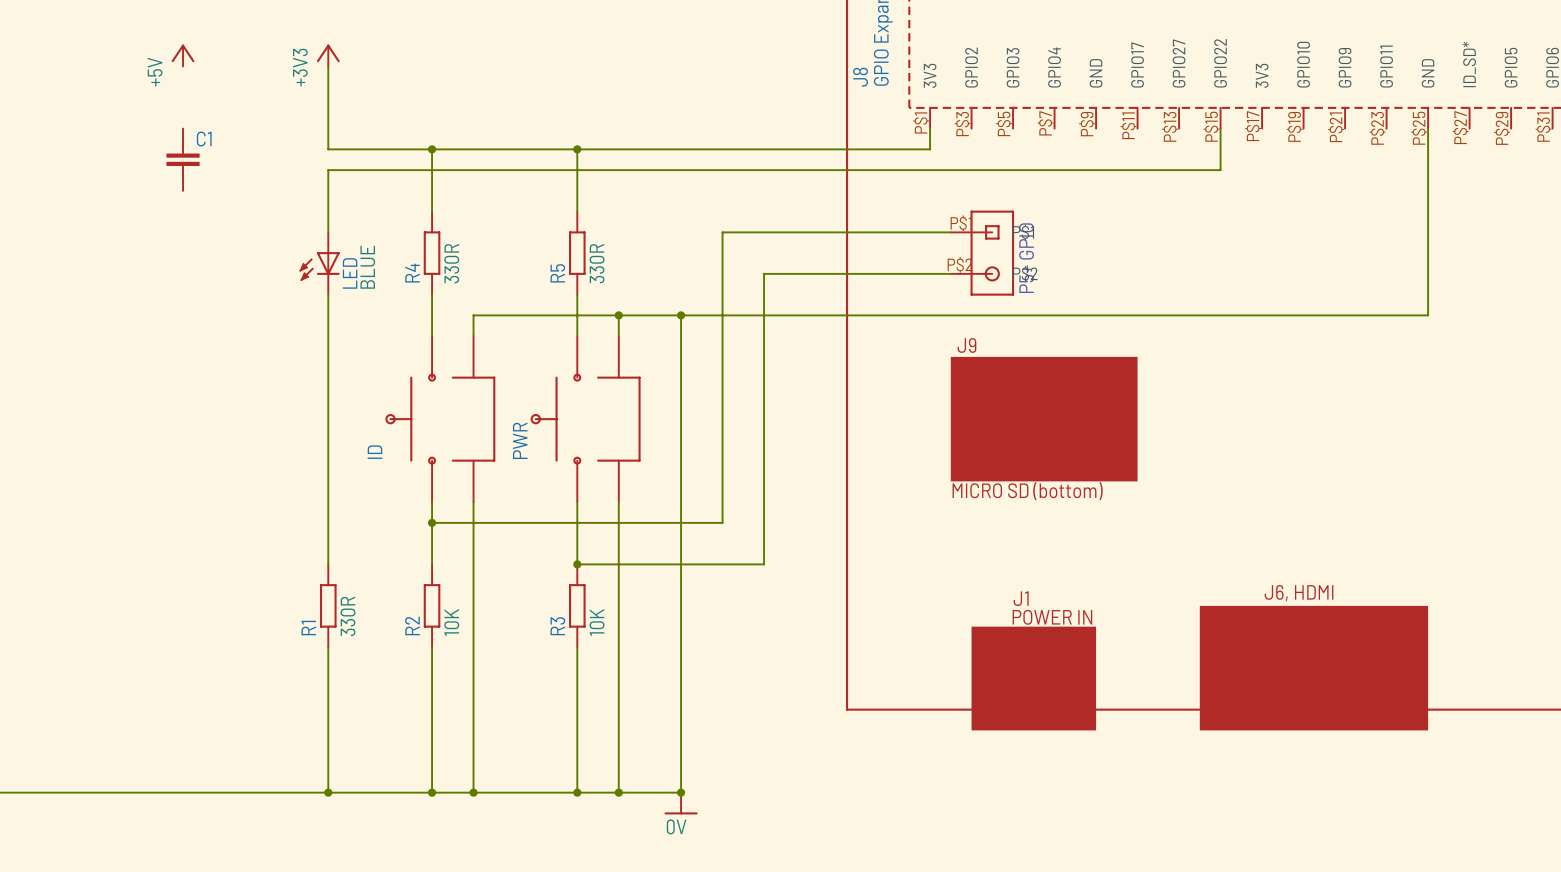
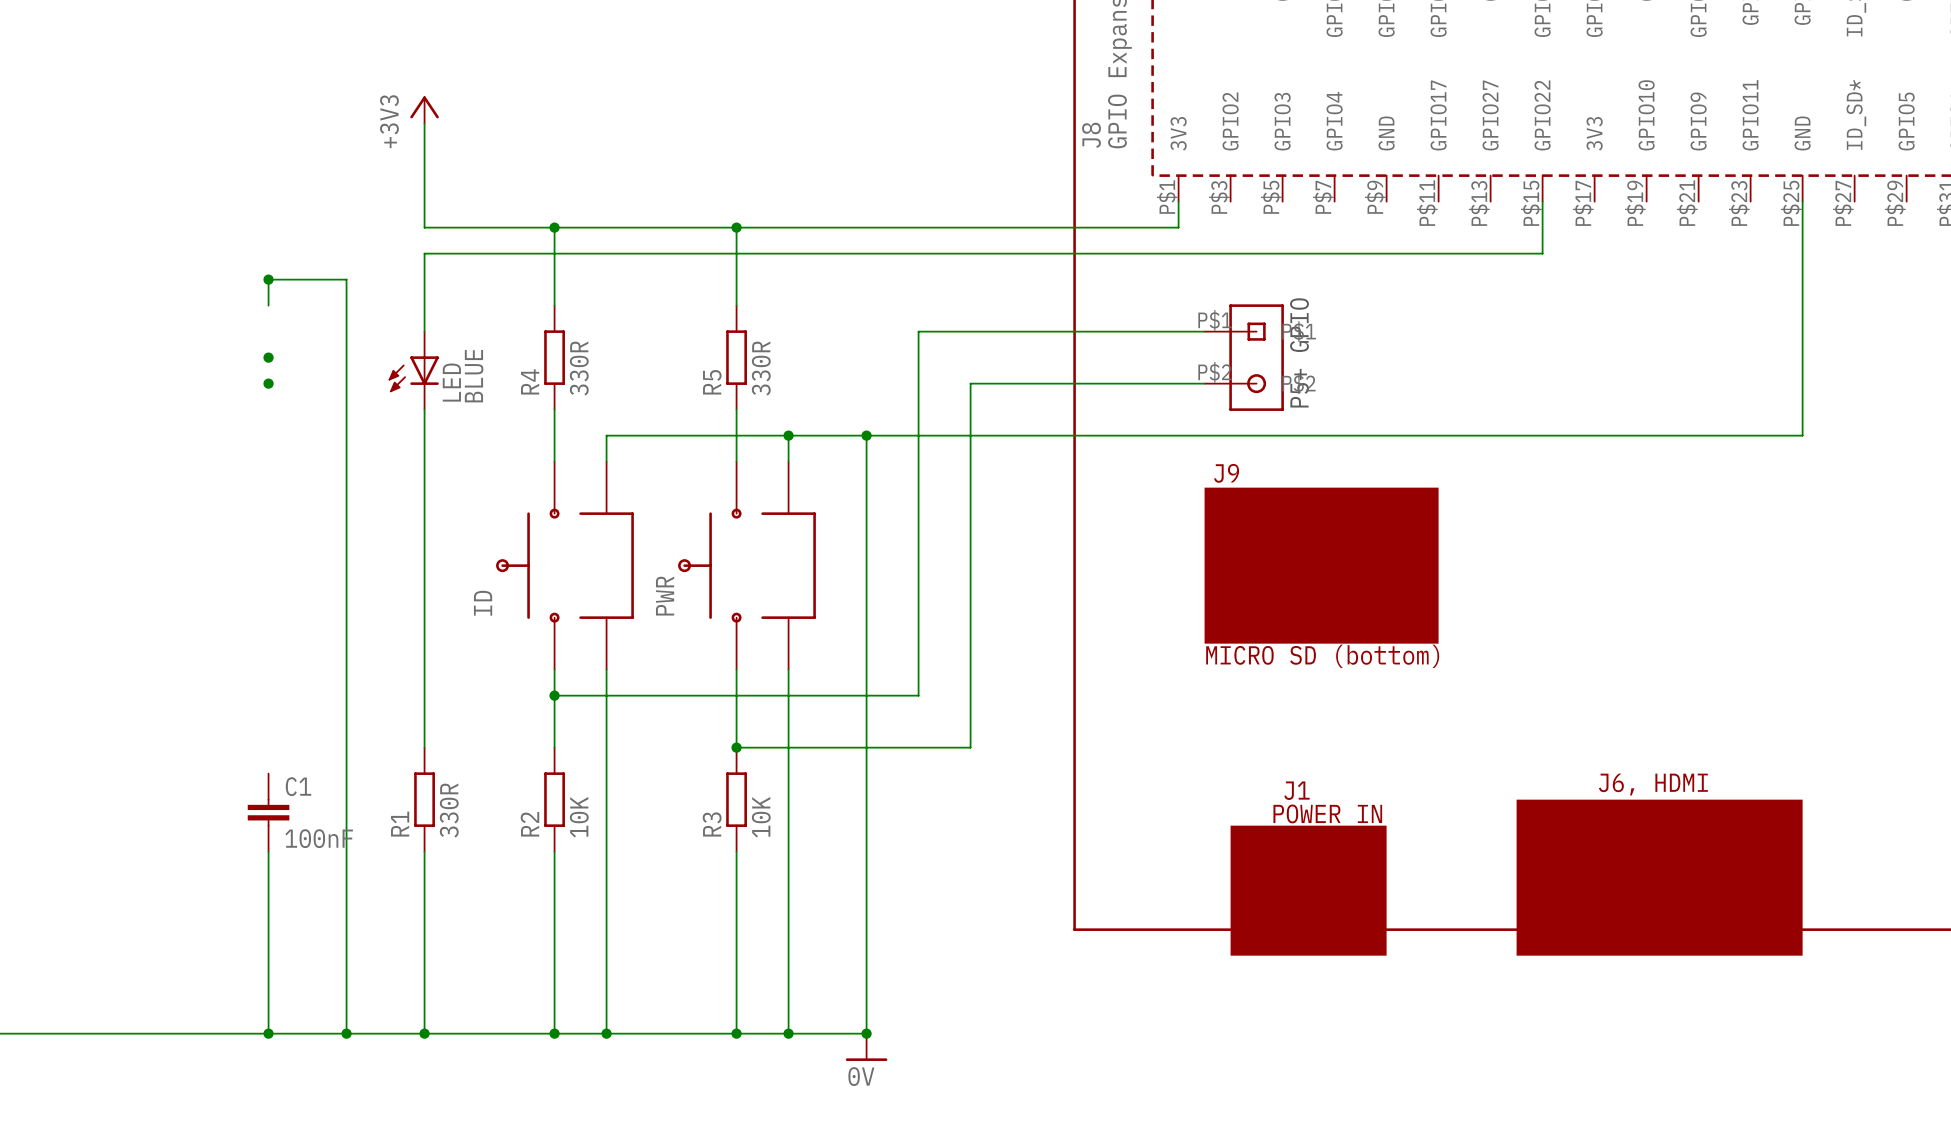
power symbol: +5V (183, 55) -> none
C1 position: (183, 159) -> (268, 812)
junction: none -> (268, 279)
wire: none -> (268, 305) (268, 279) (346, 279) (346, 1033)
junction: none -> (268, 357)
junction: none -> (268, 383)
C1 value: none -> 100nF (319, 838)
wire: none -> (268, 851) (268, 1033)
junction: none -> (268, 1033)
junction: none -> (346, 1033)

